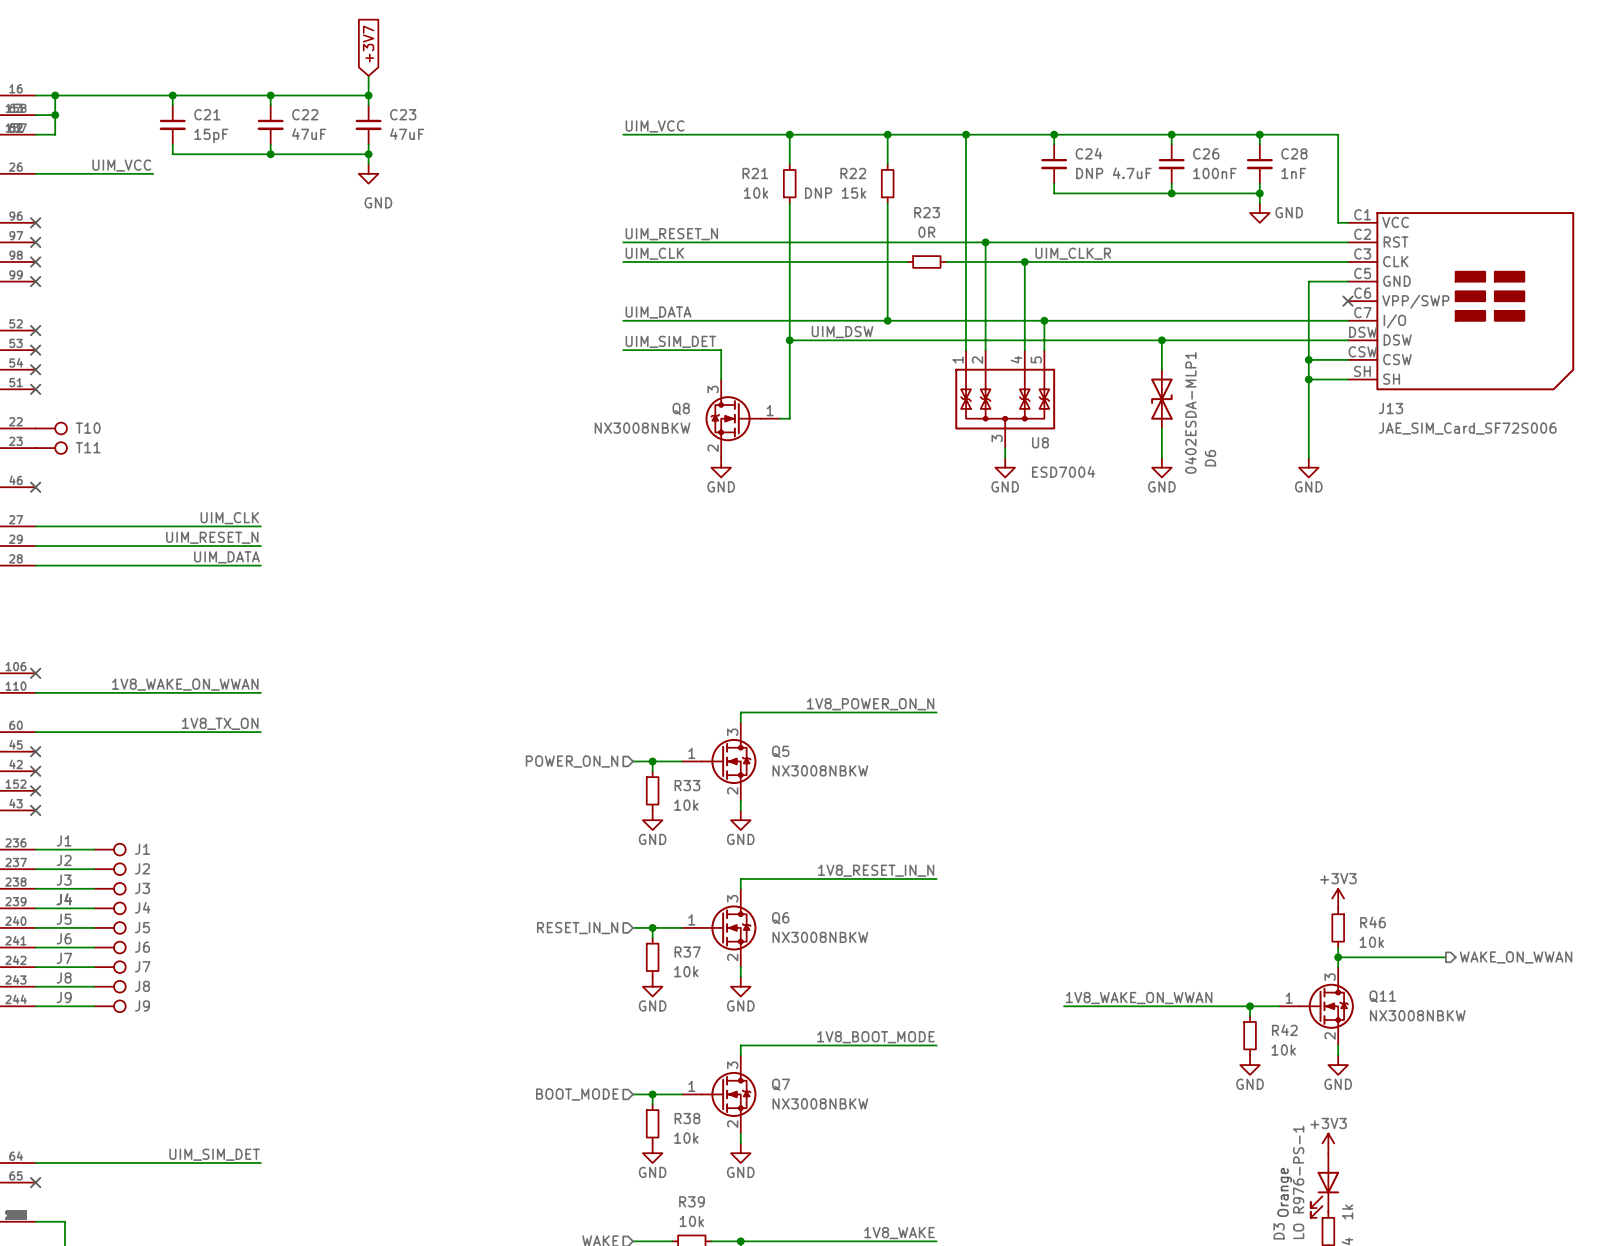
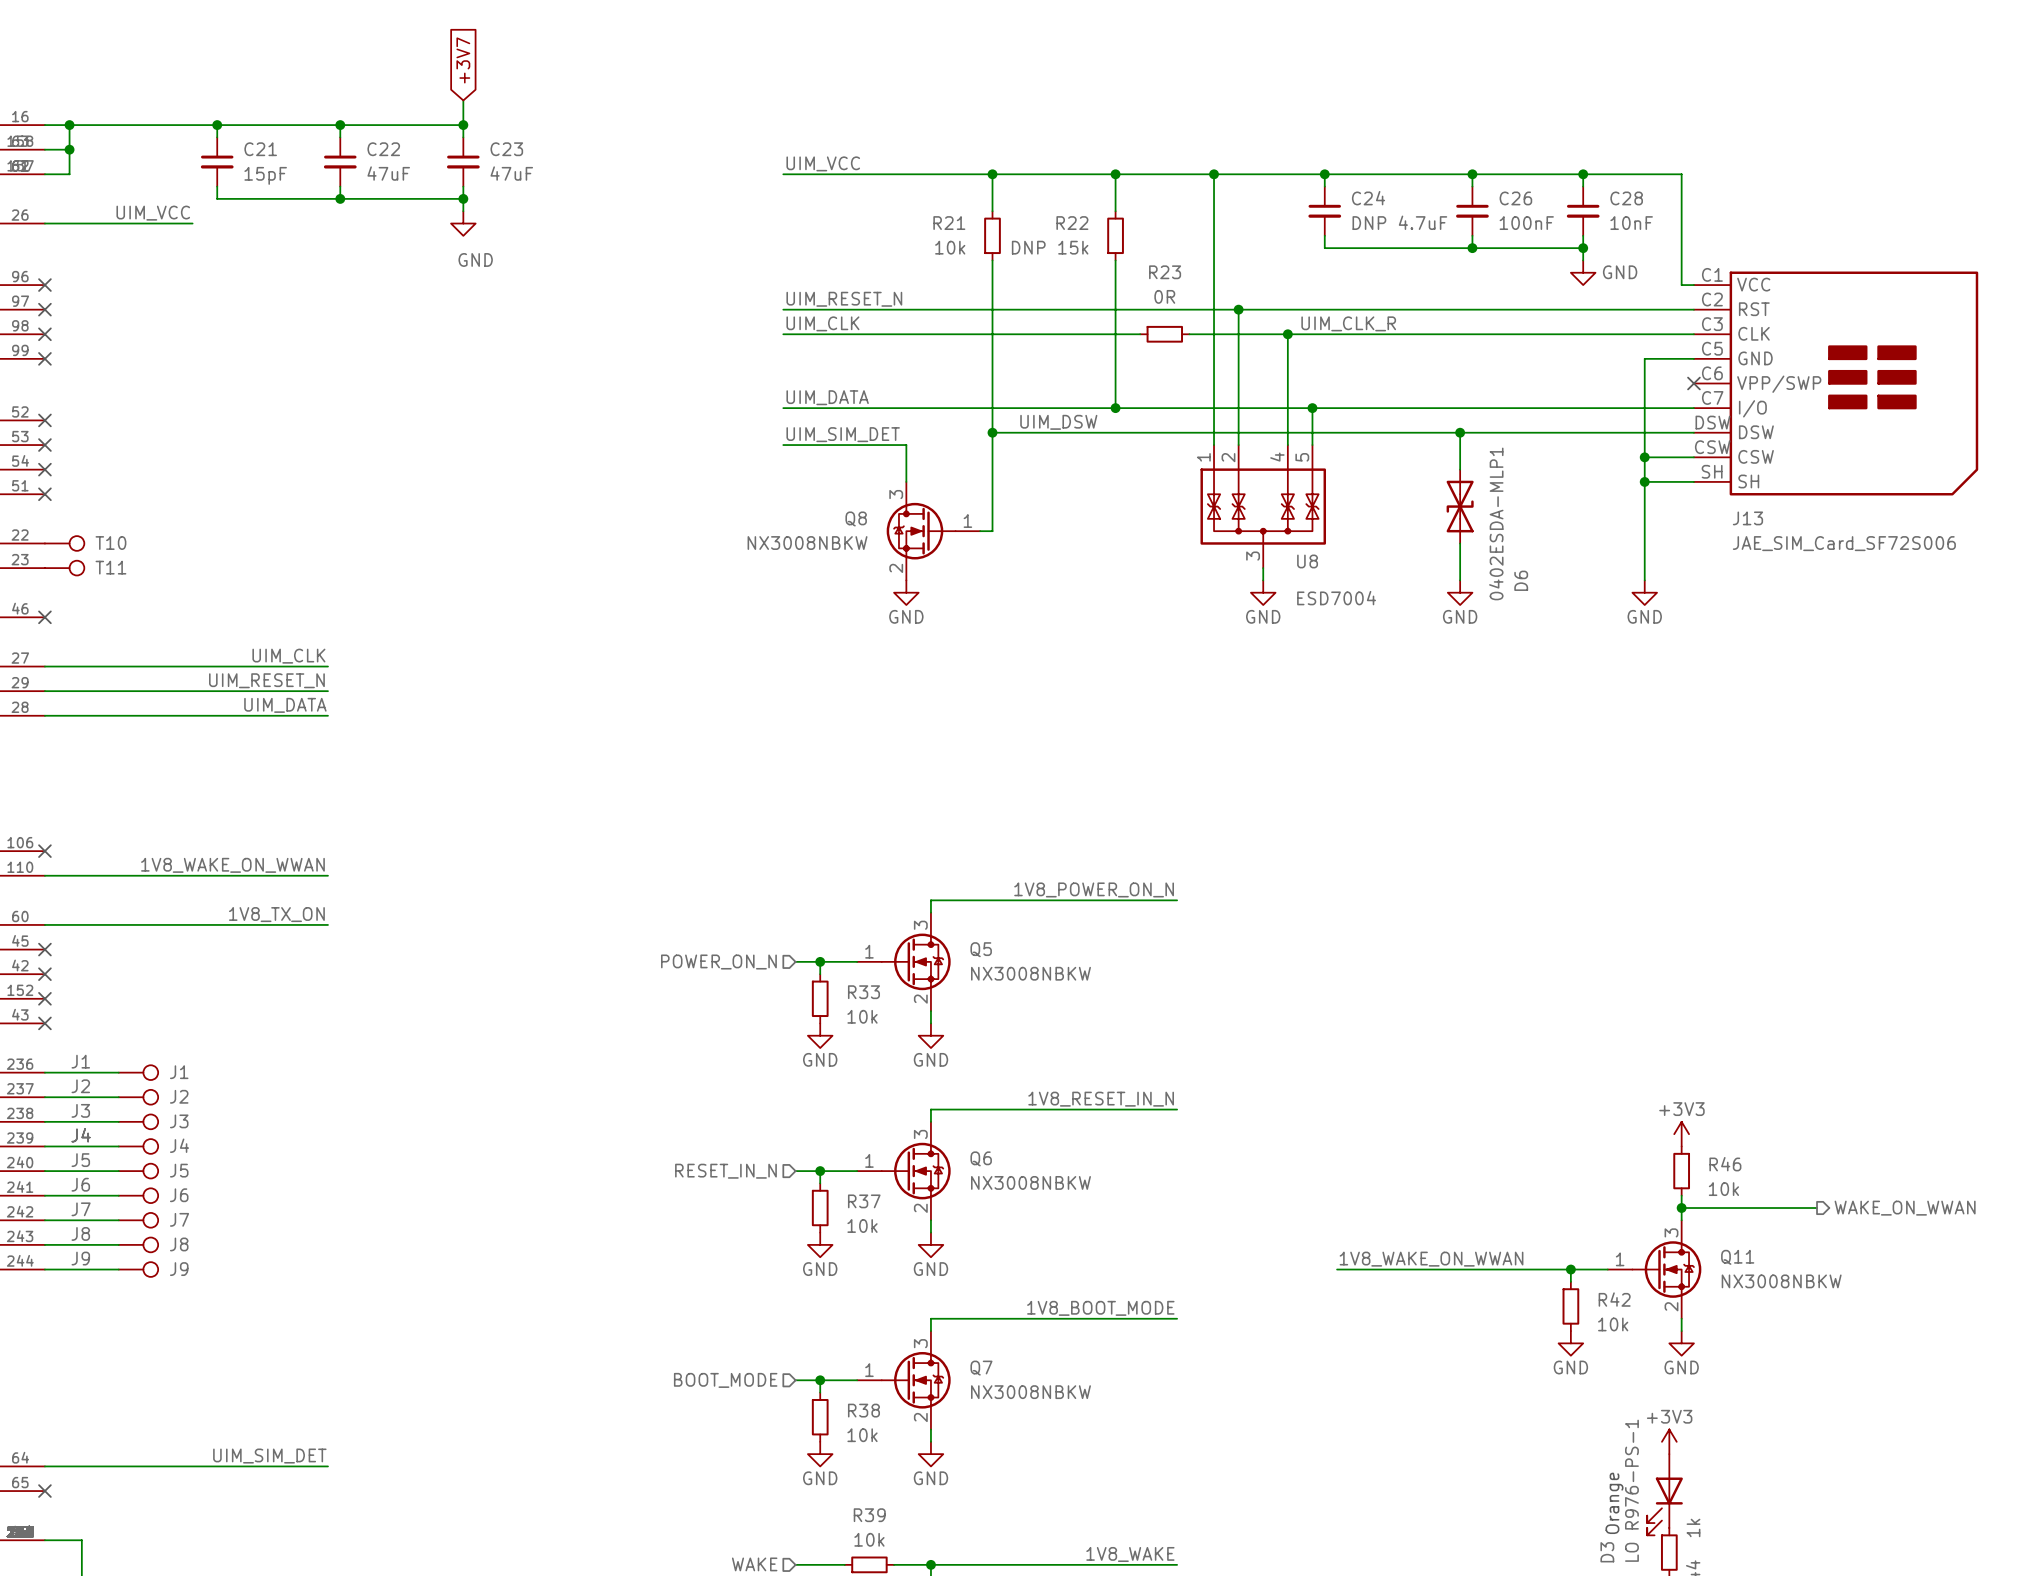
C28 value: 1nF (1293, 173) -> 10nF (1631, 223)

